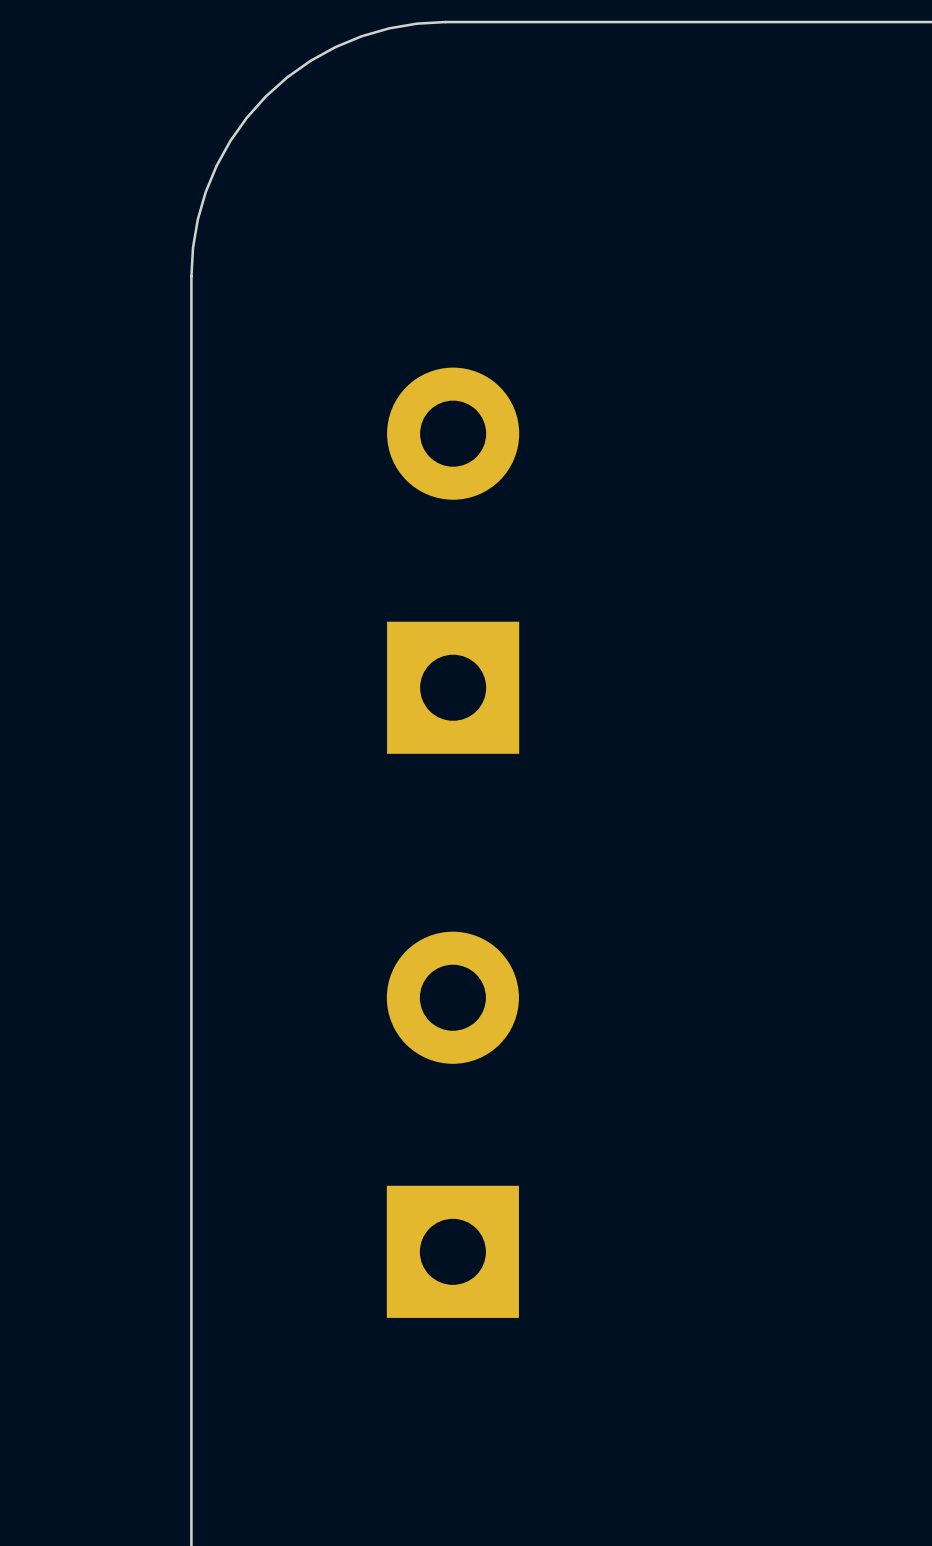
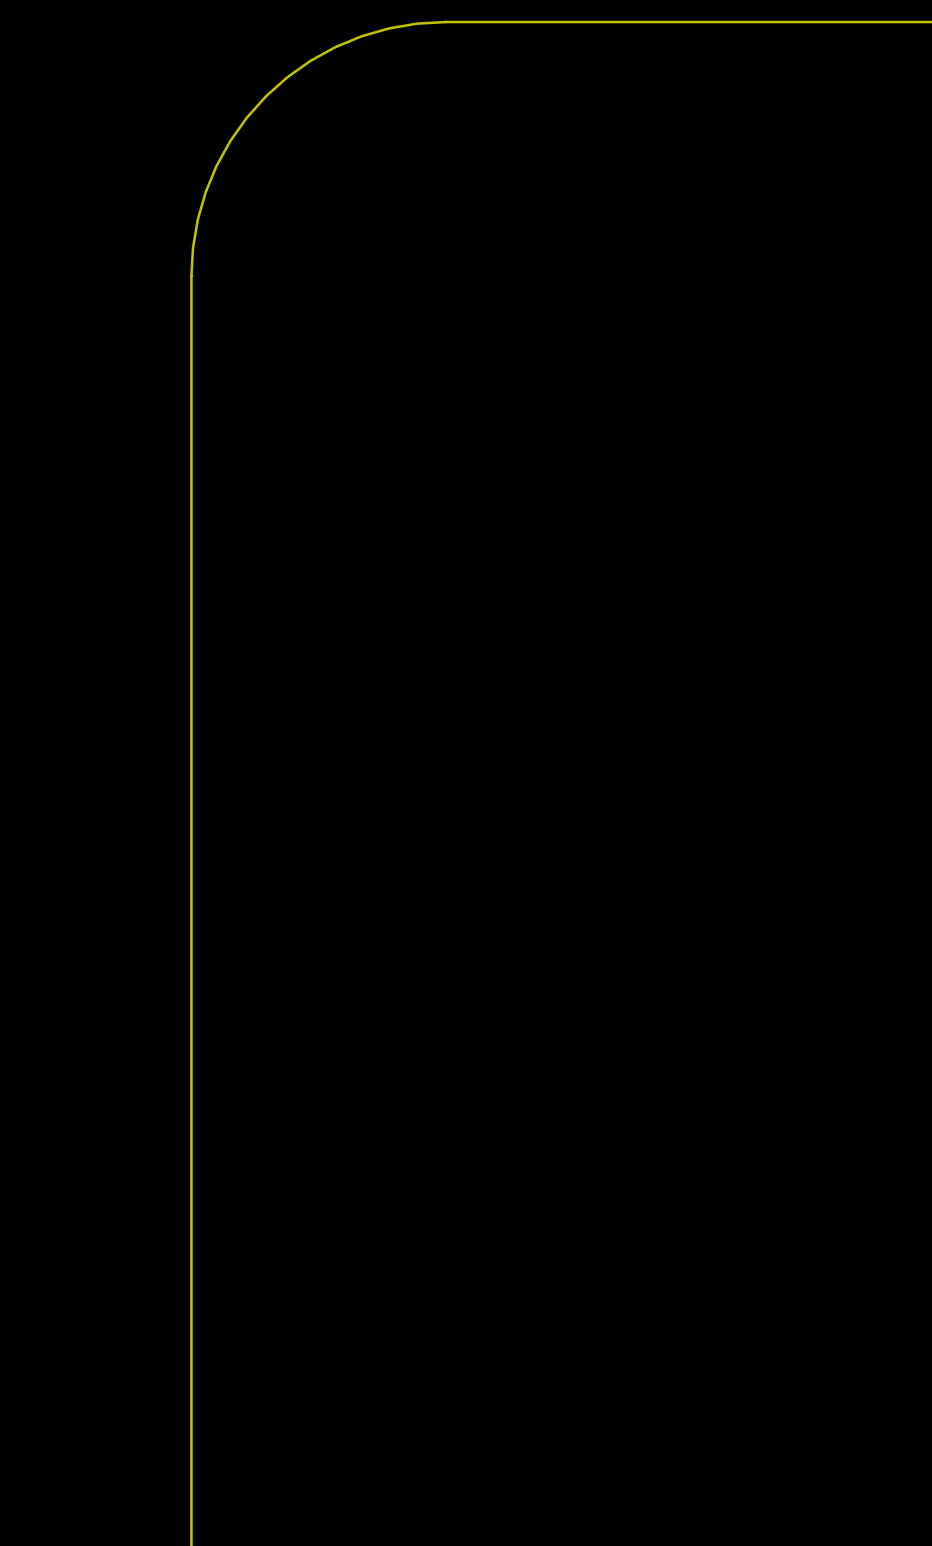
part: (453, 560) -> none
part: (452, 1124) -> none

